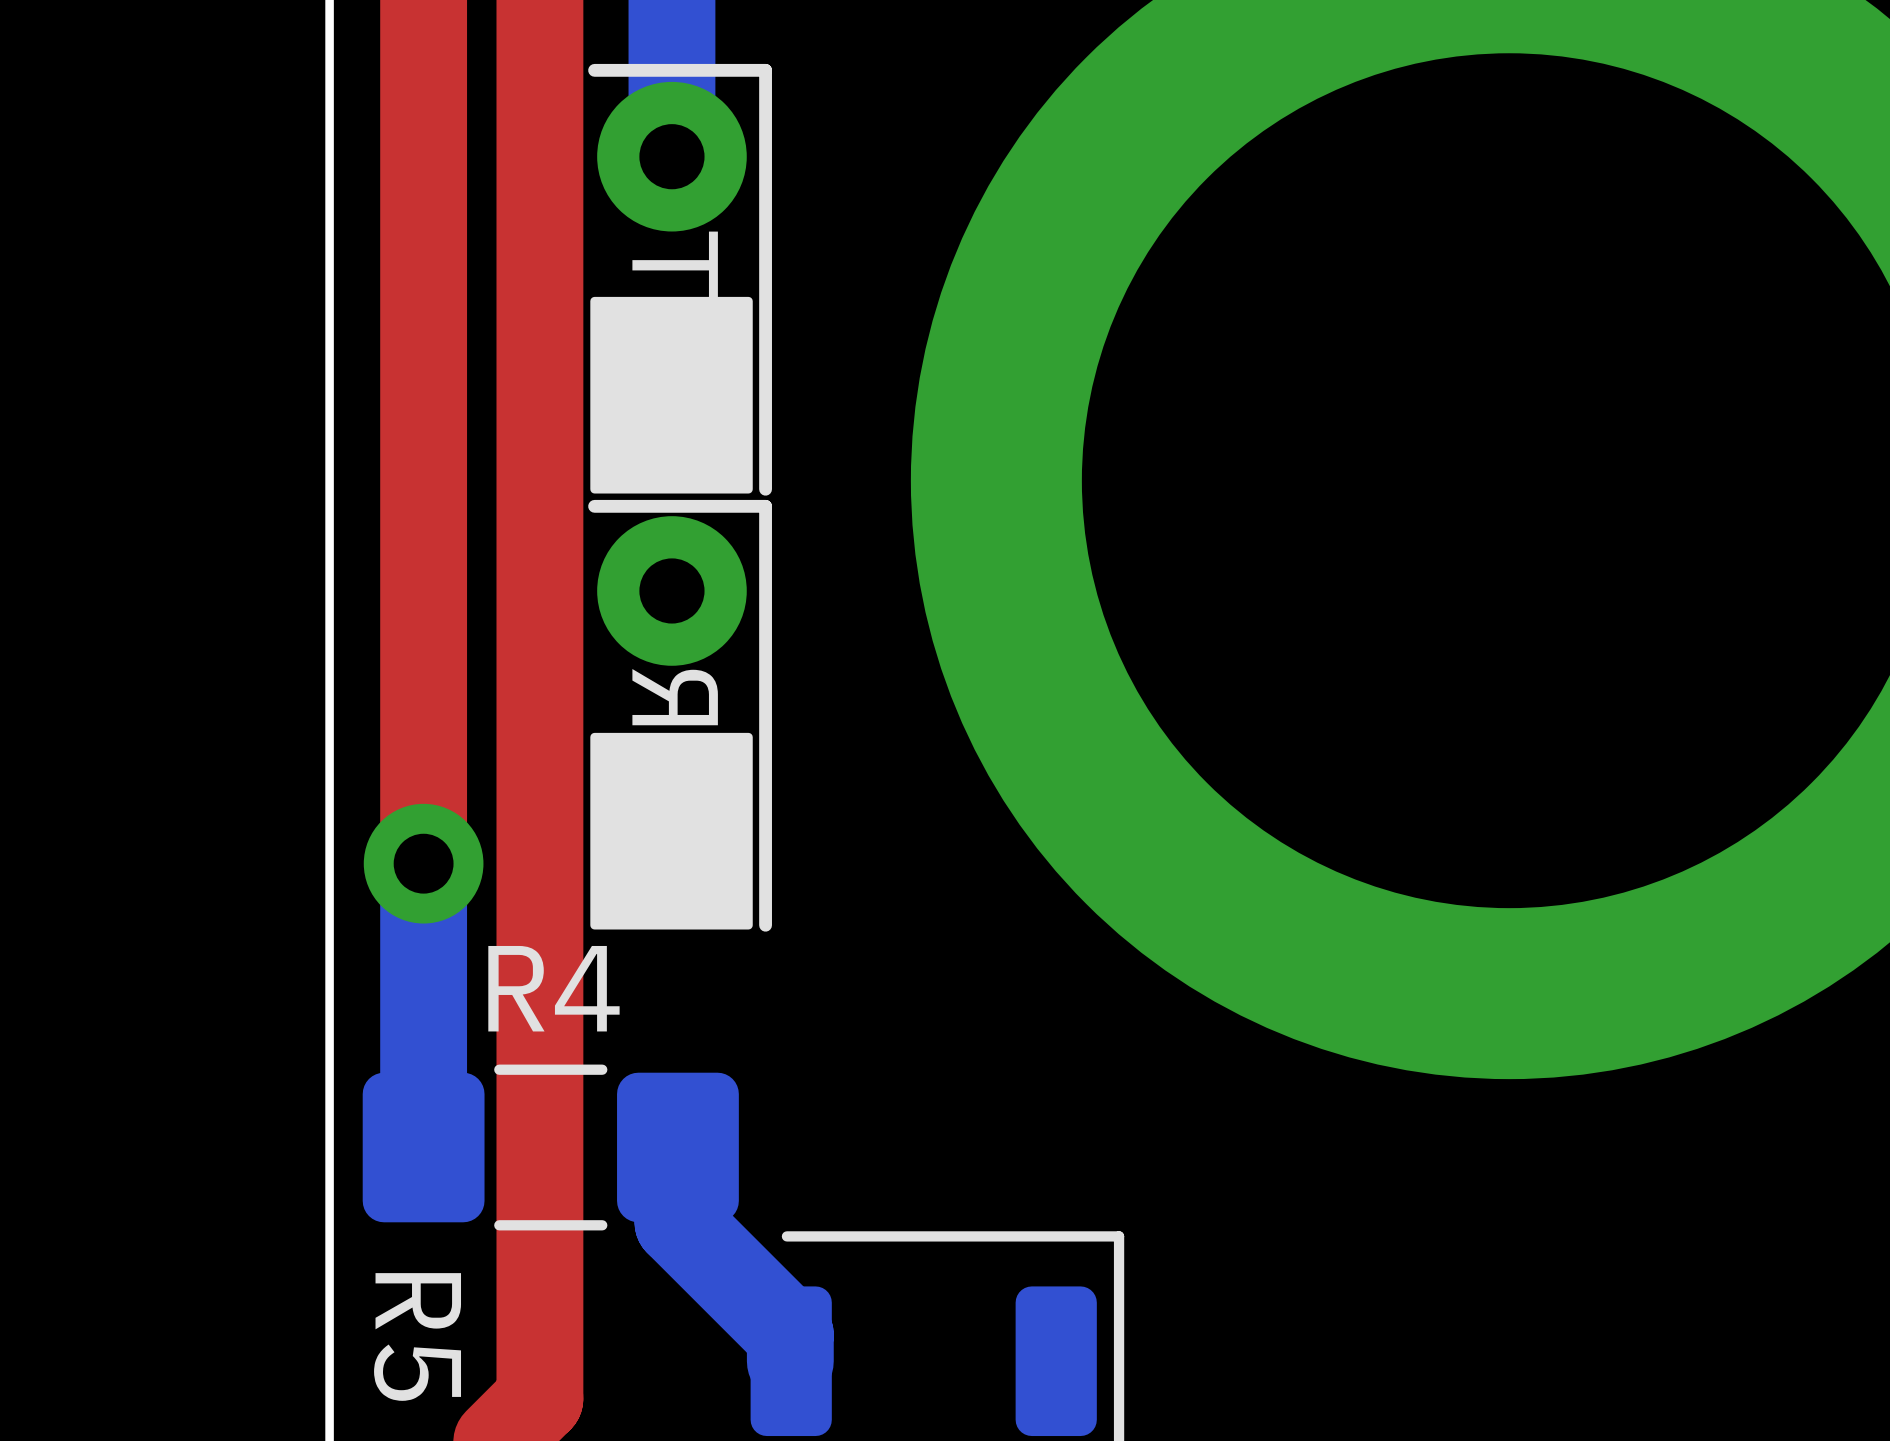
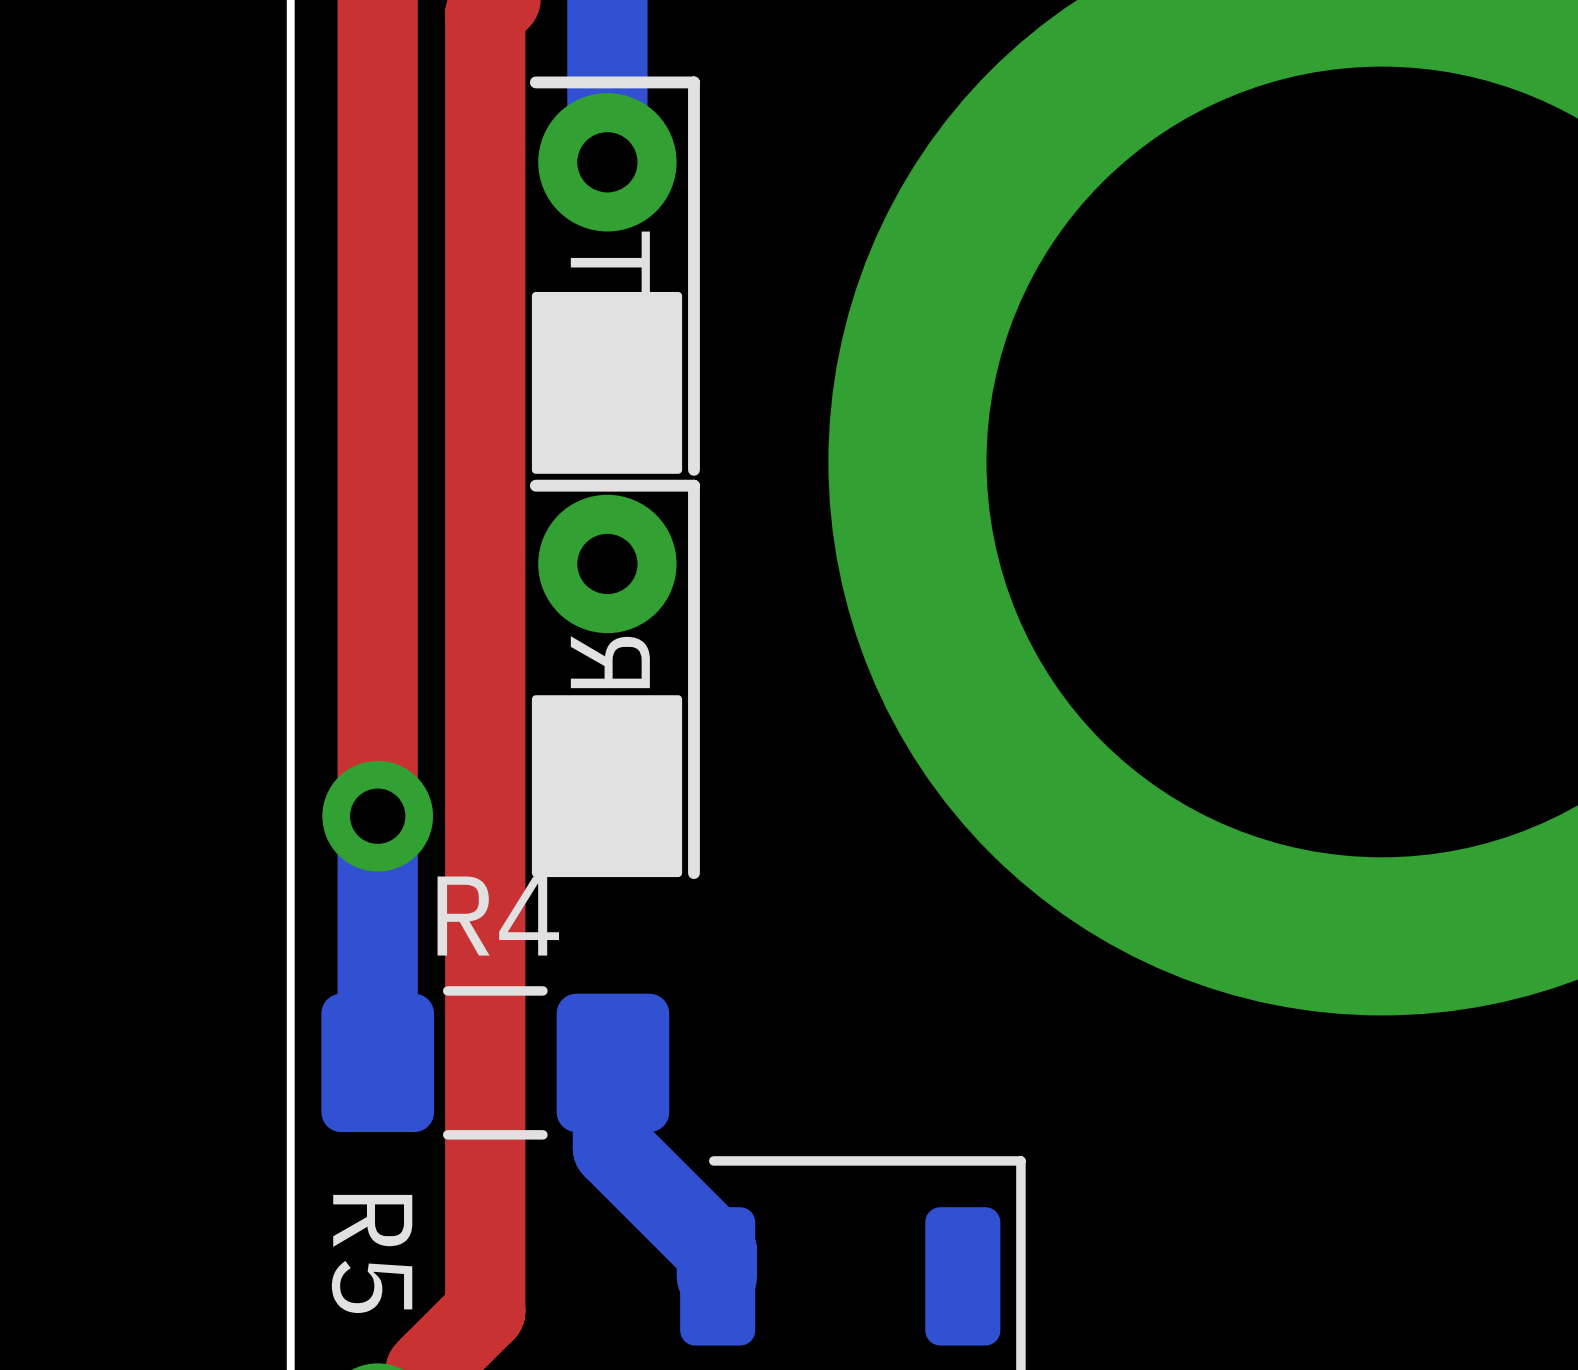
R4 position: (550, 1147) -> (495, 1062)

